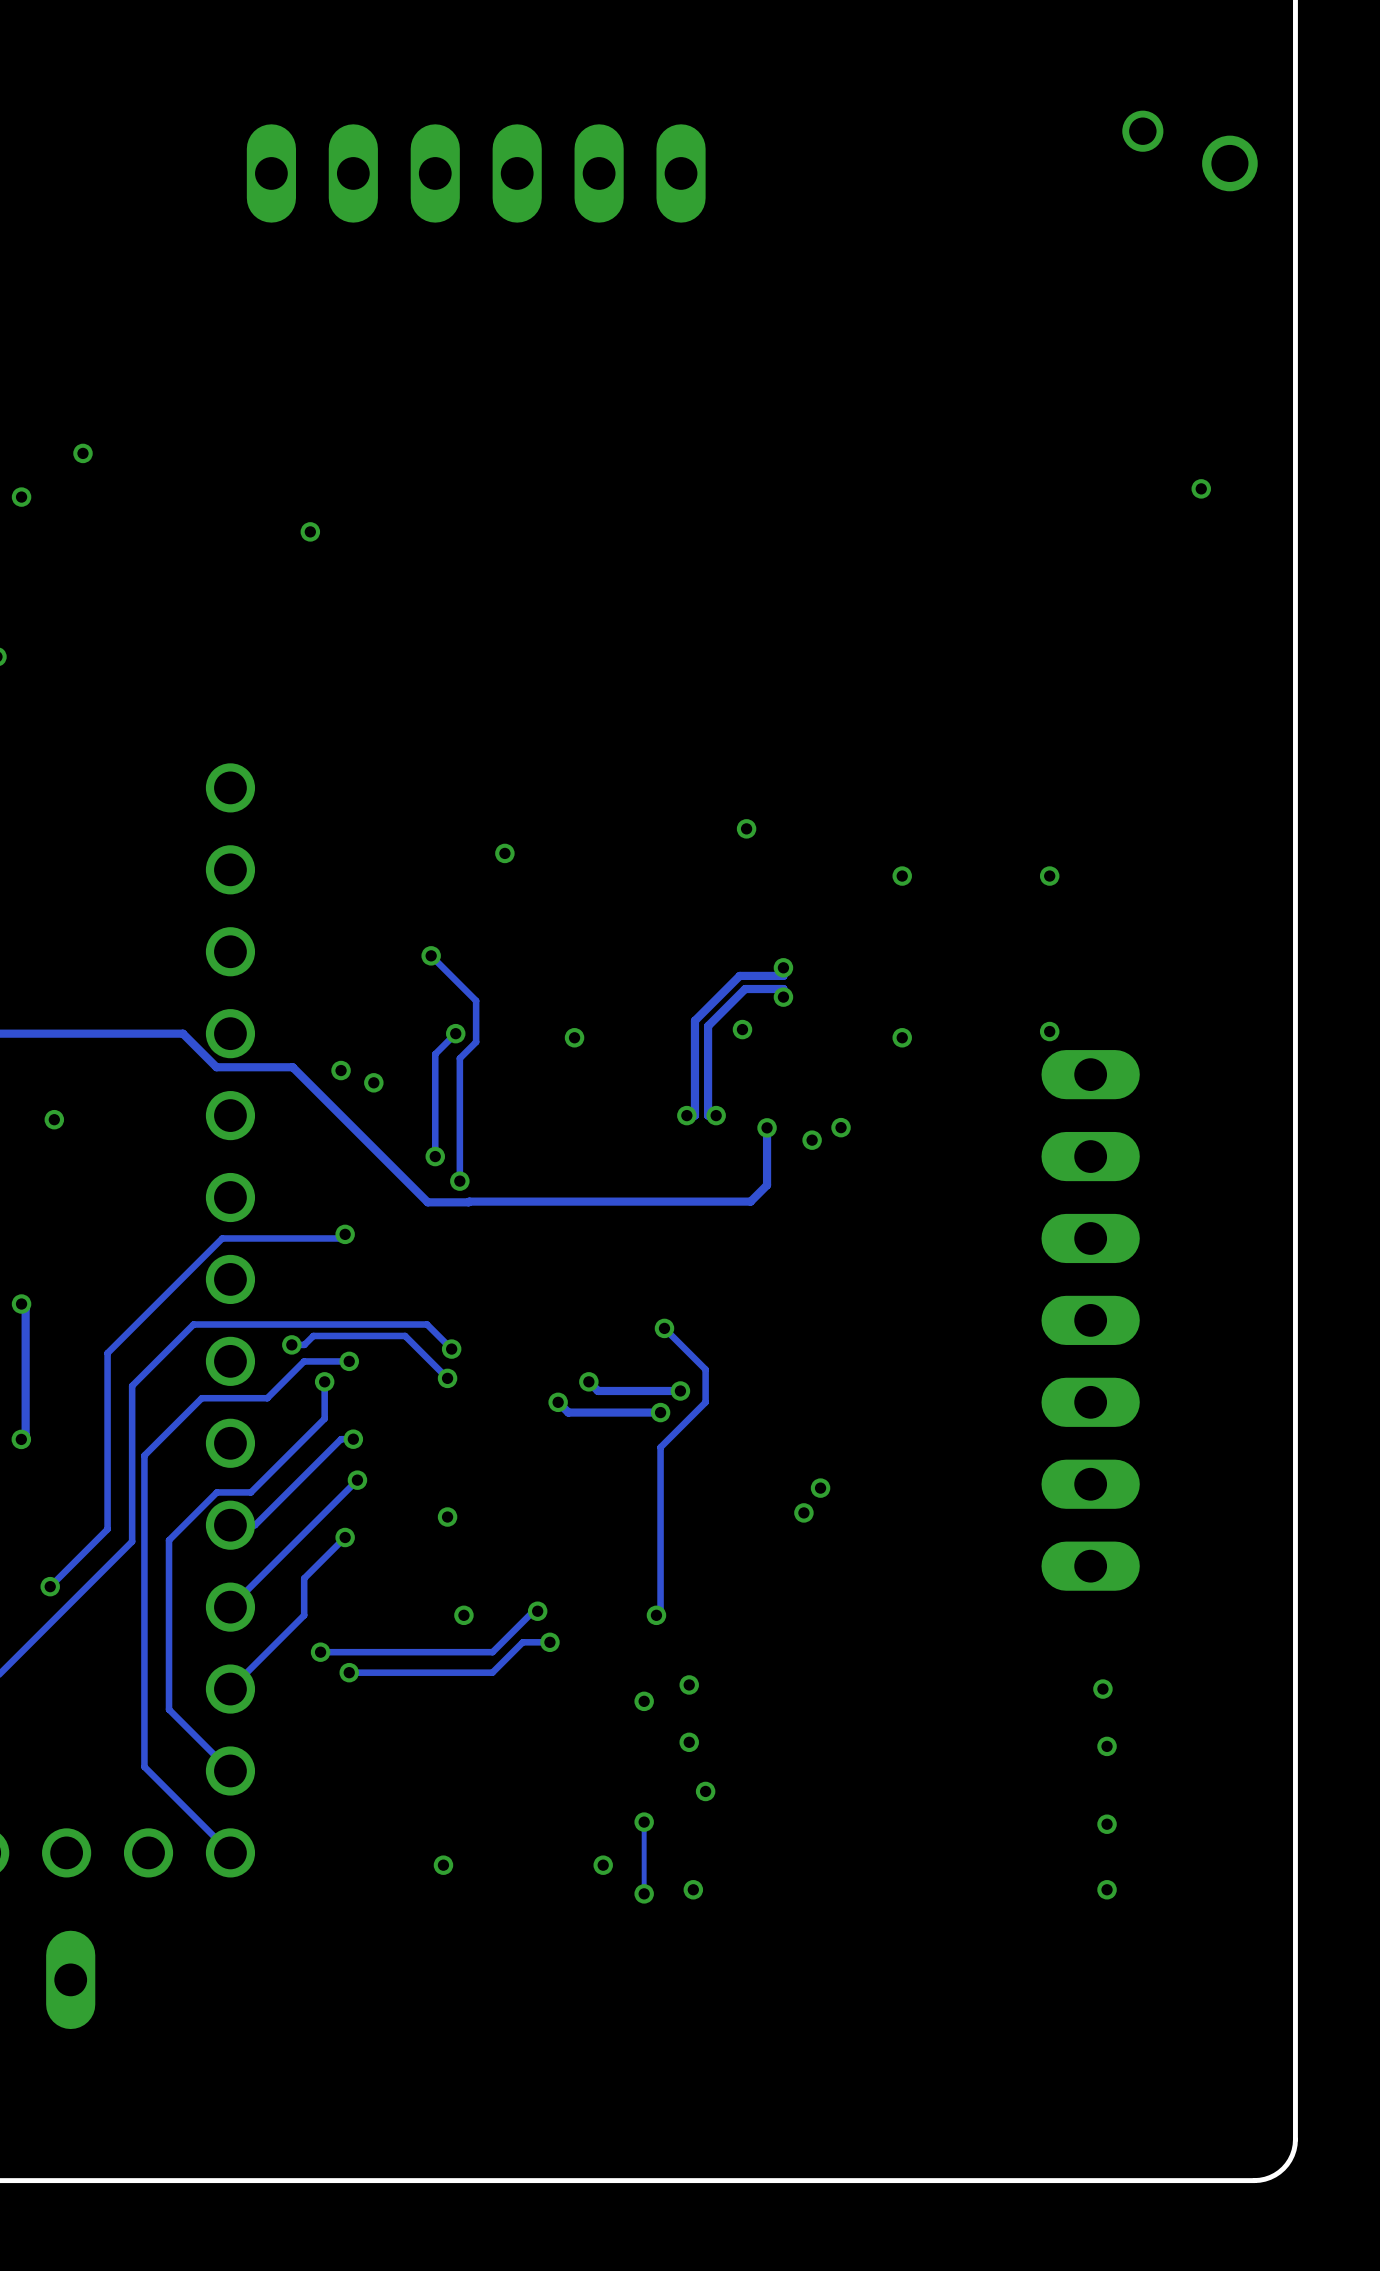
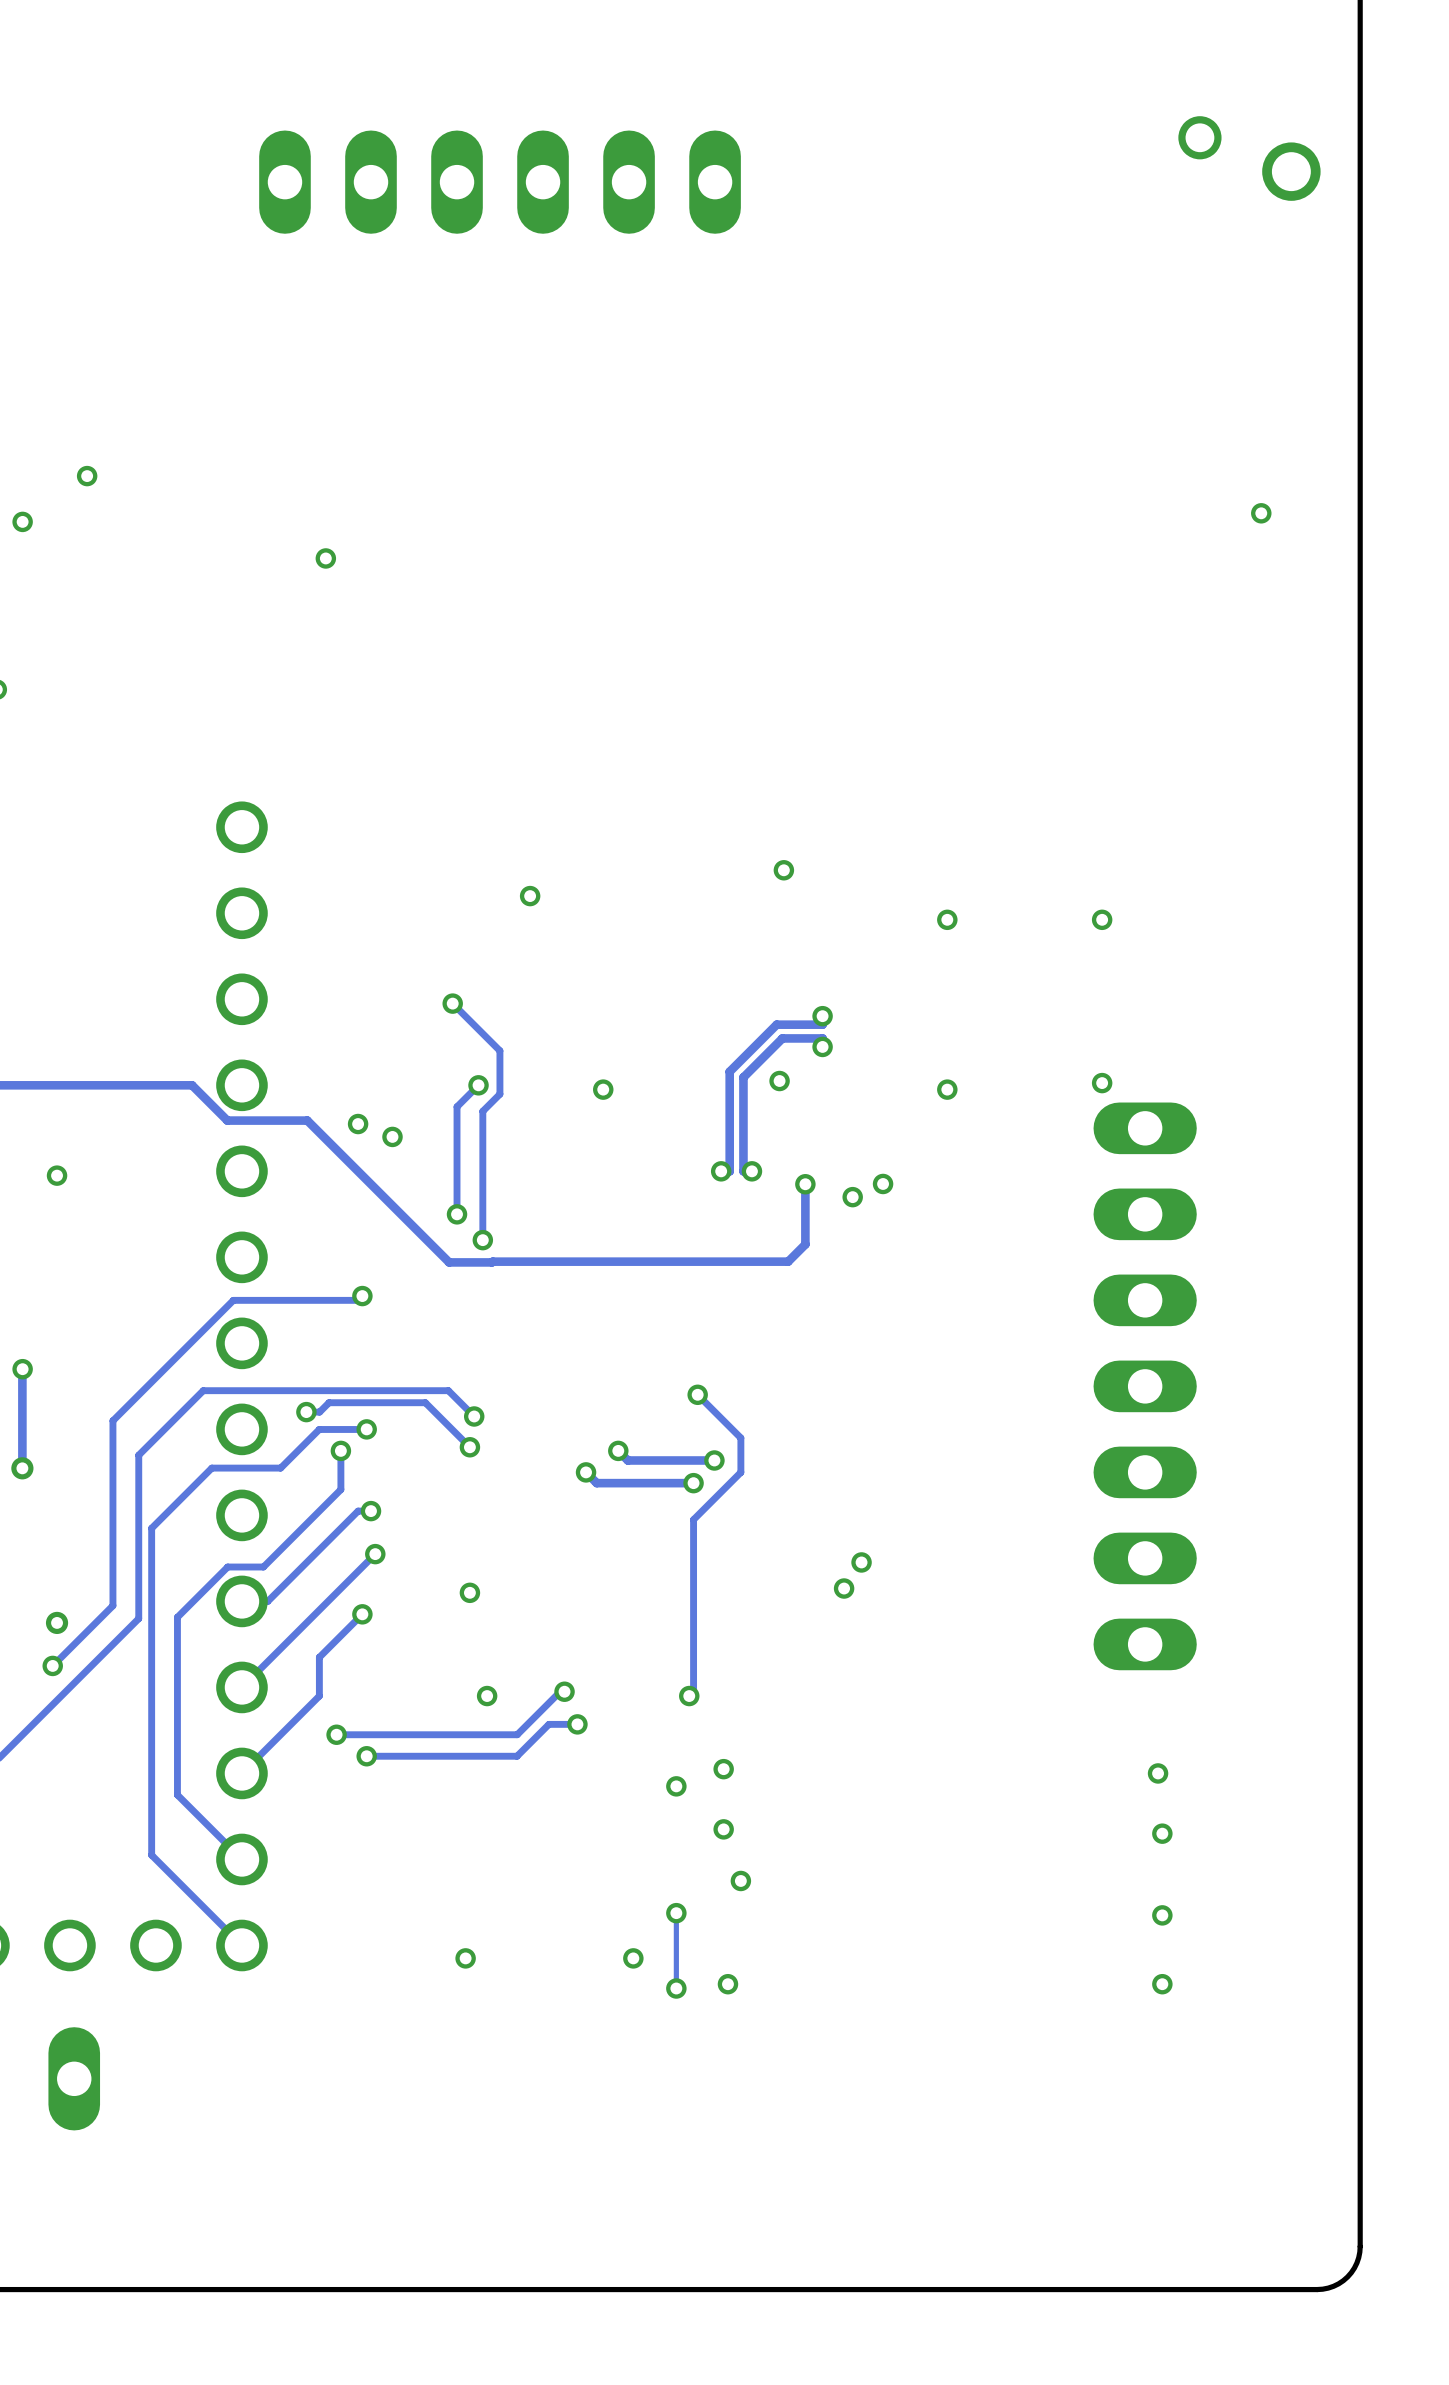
track: (21, 1304) (25, 1308) (25, 1435) (21, 1439) -> (22, 1369) (22, 1468)
via: none -> (22, 1468)
via: (21, 1439) -> none
via: none -> (57, 1622)

